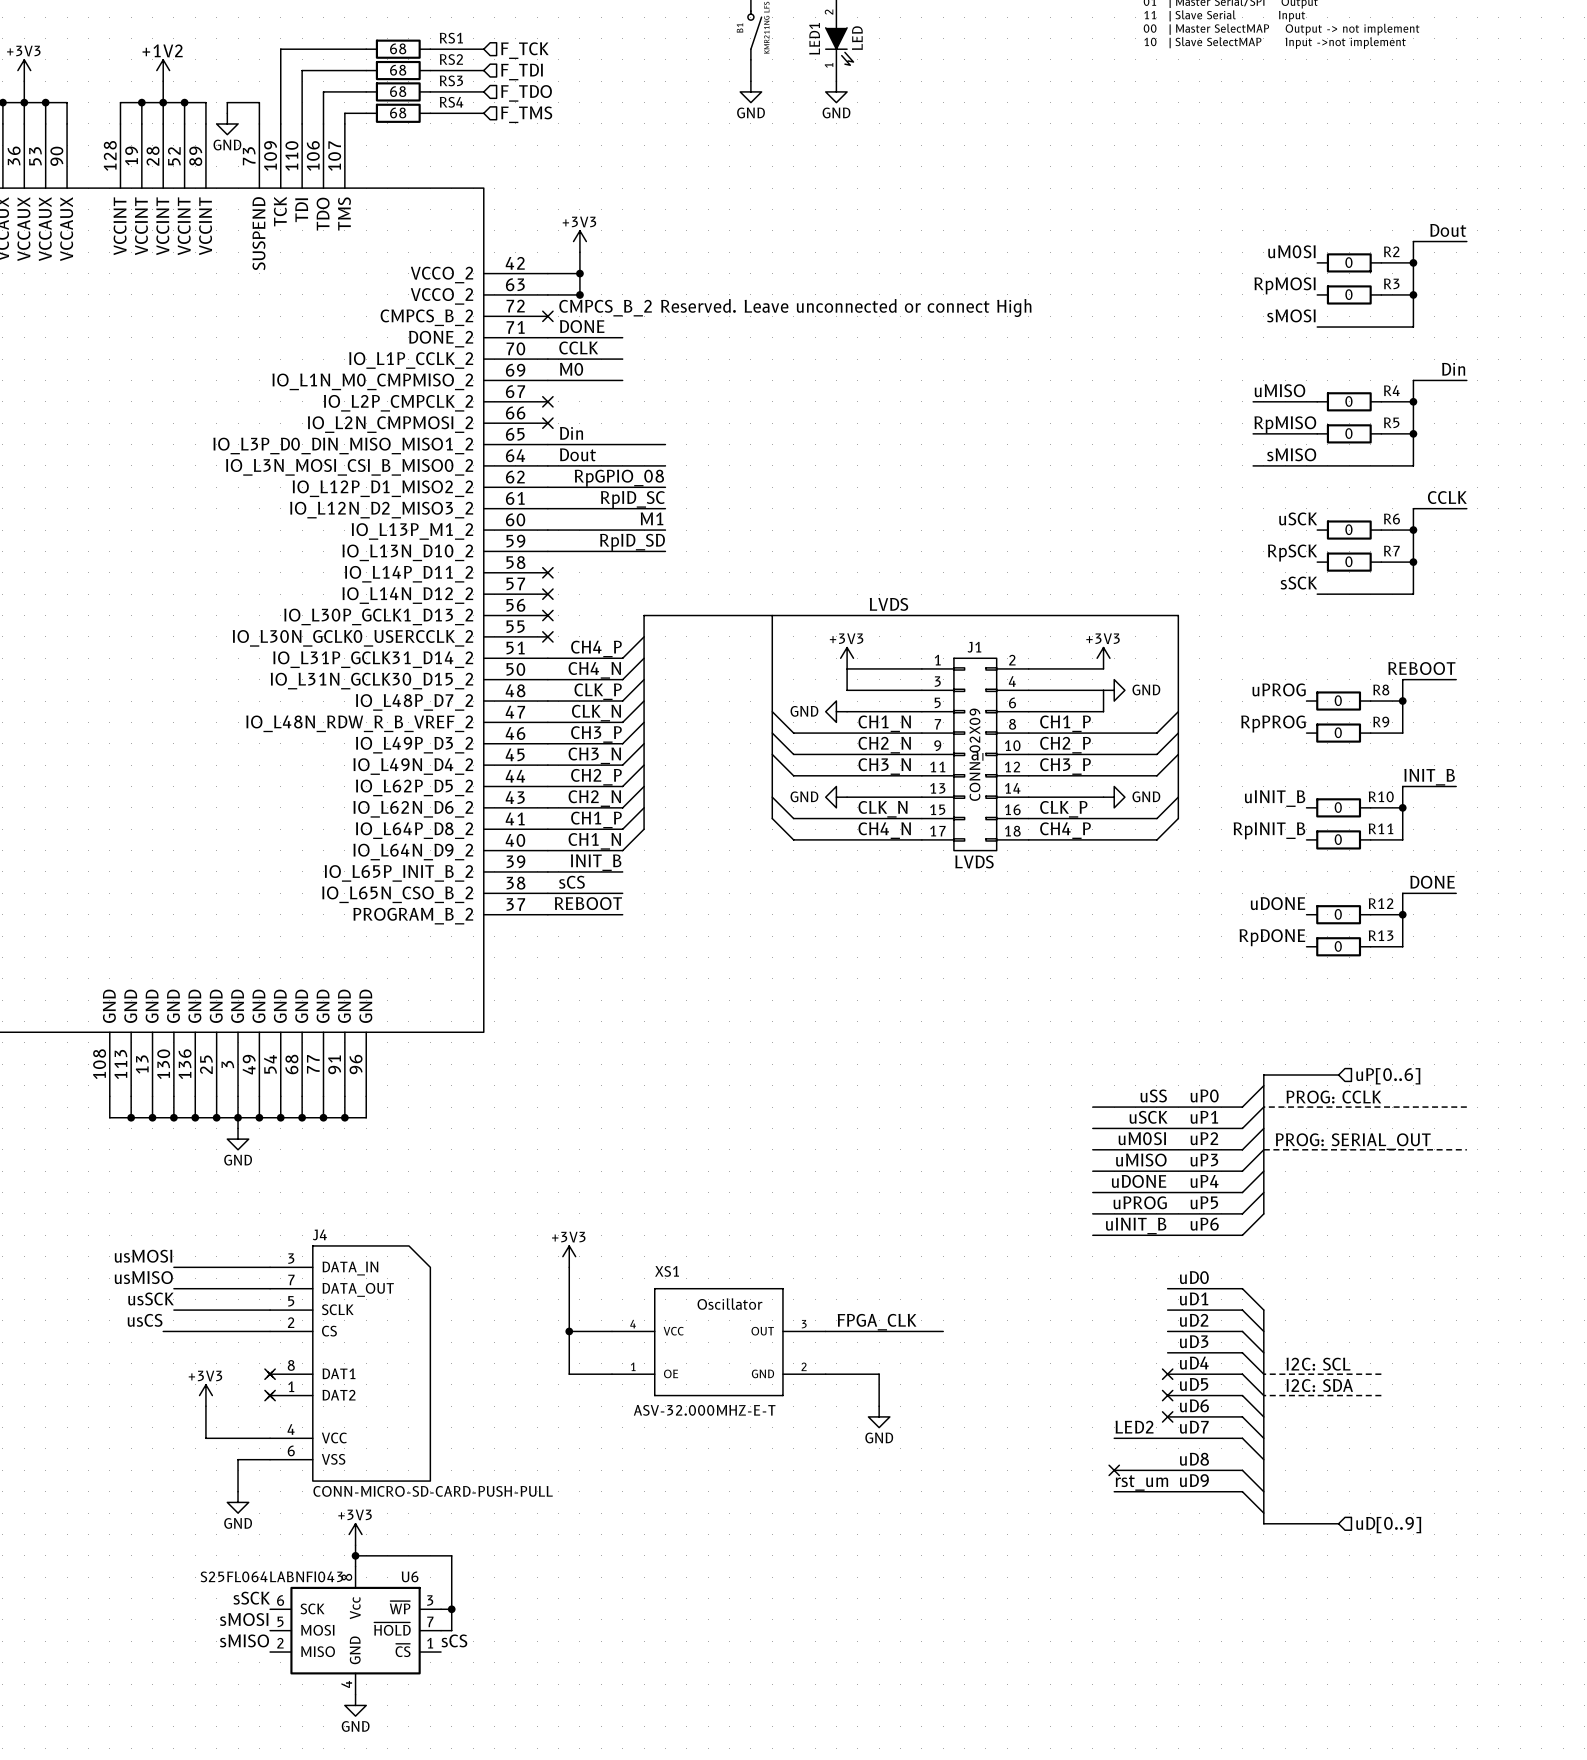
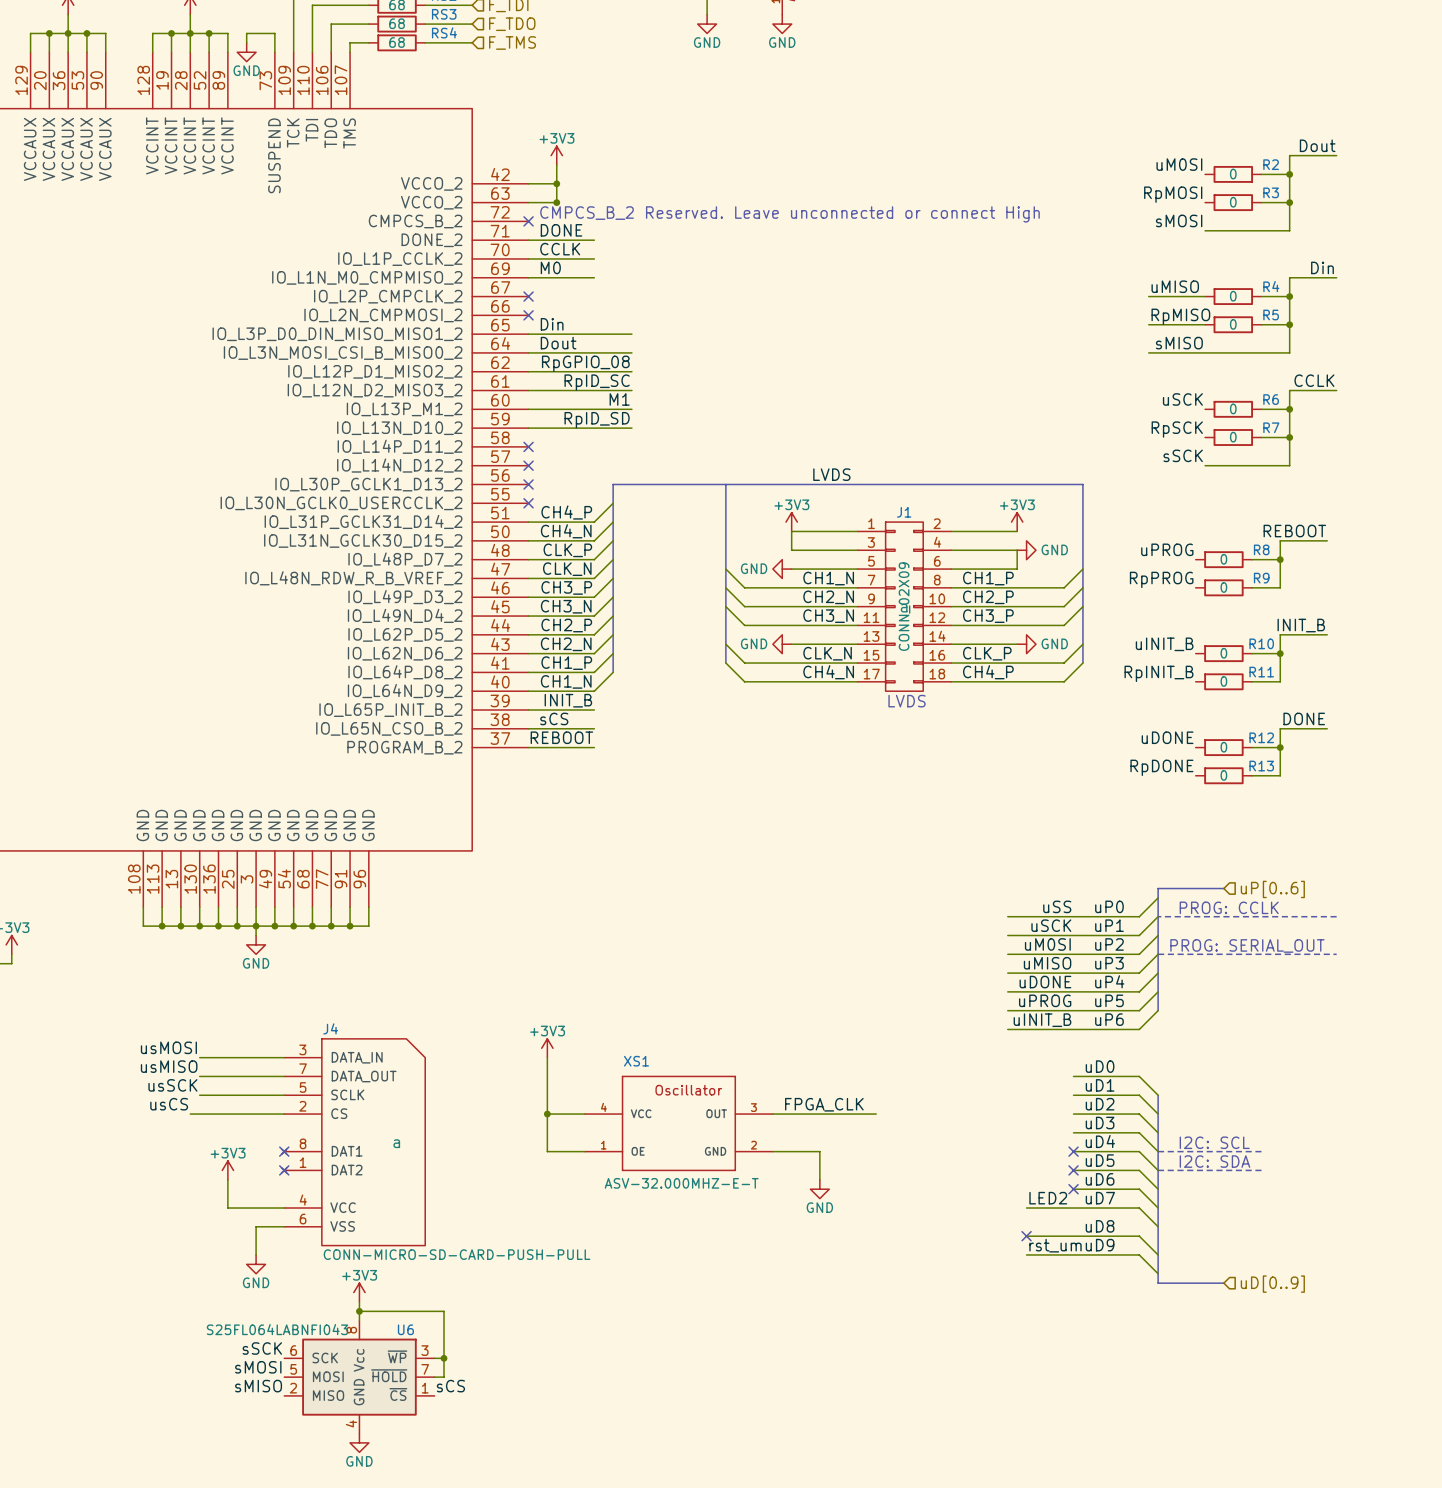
J4 text: none -> a (396, 1143)

